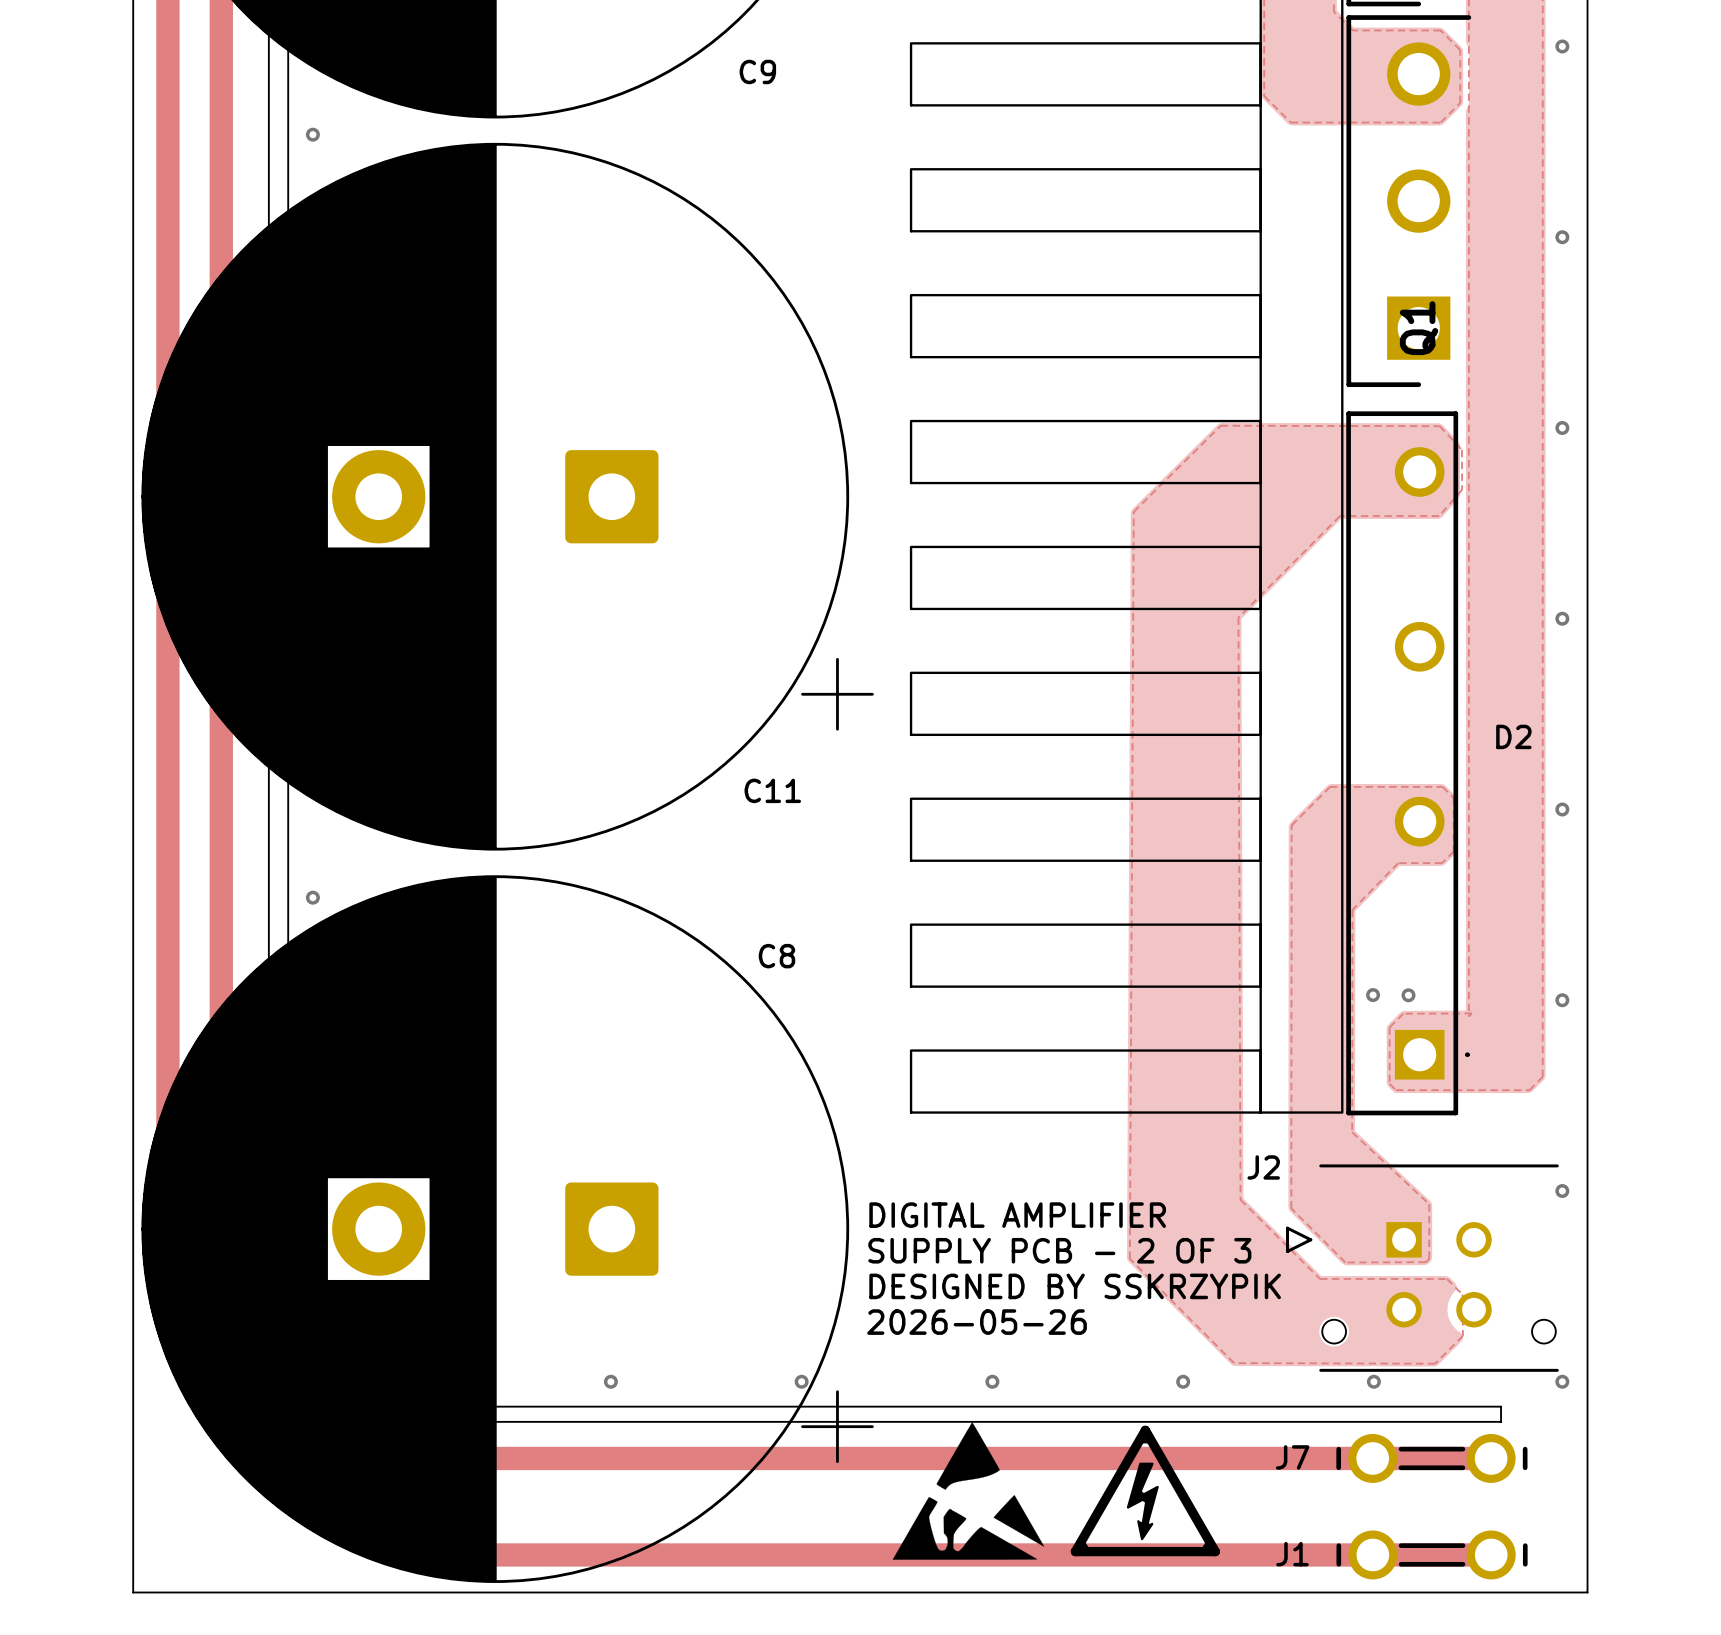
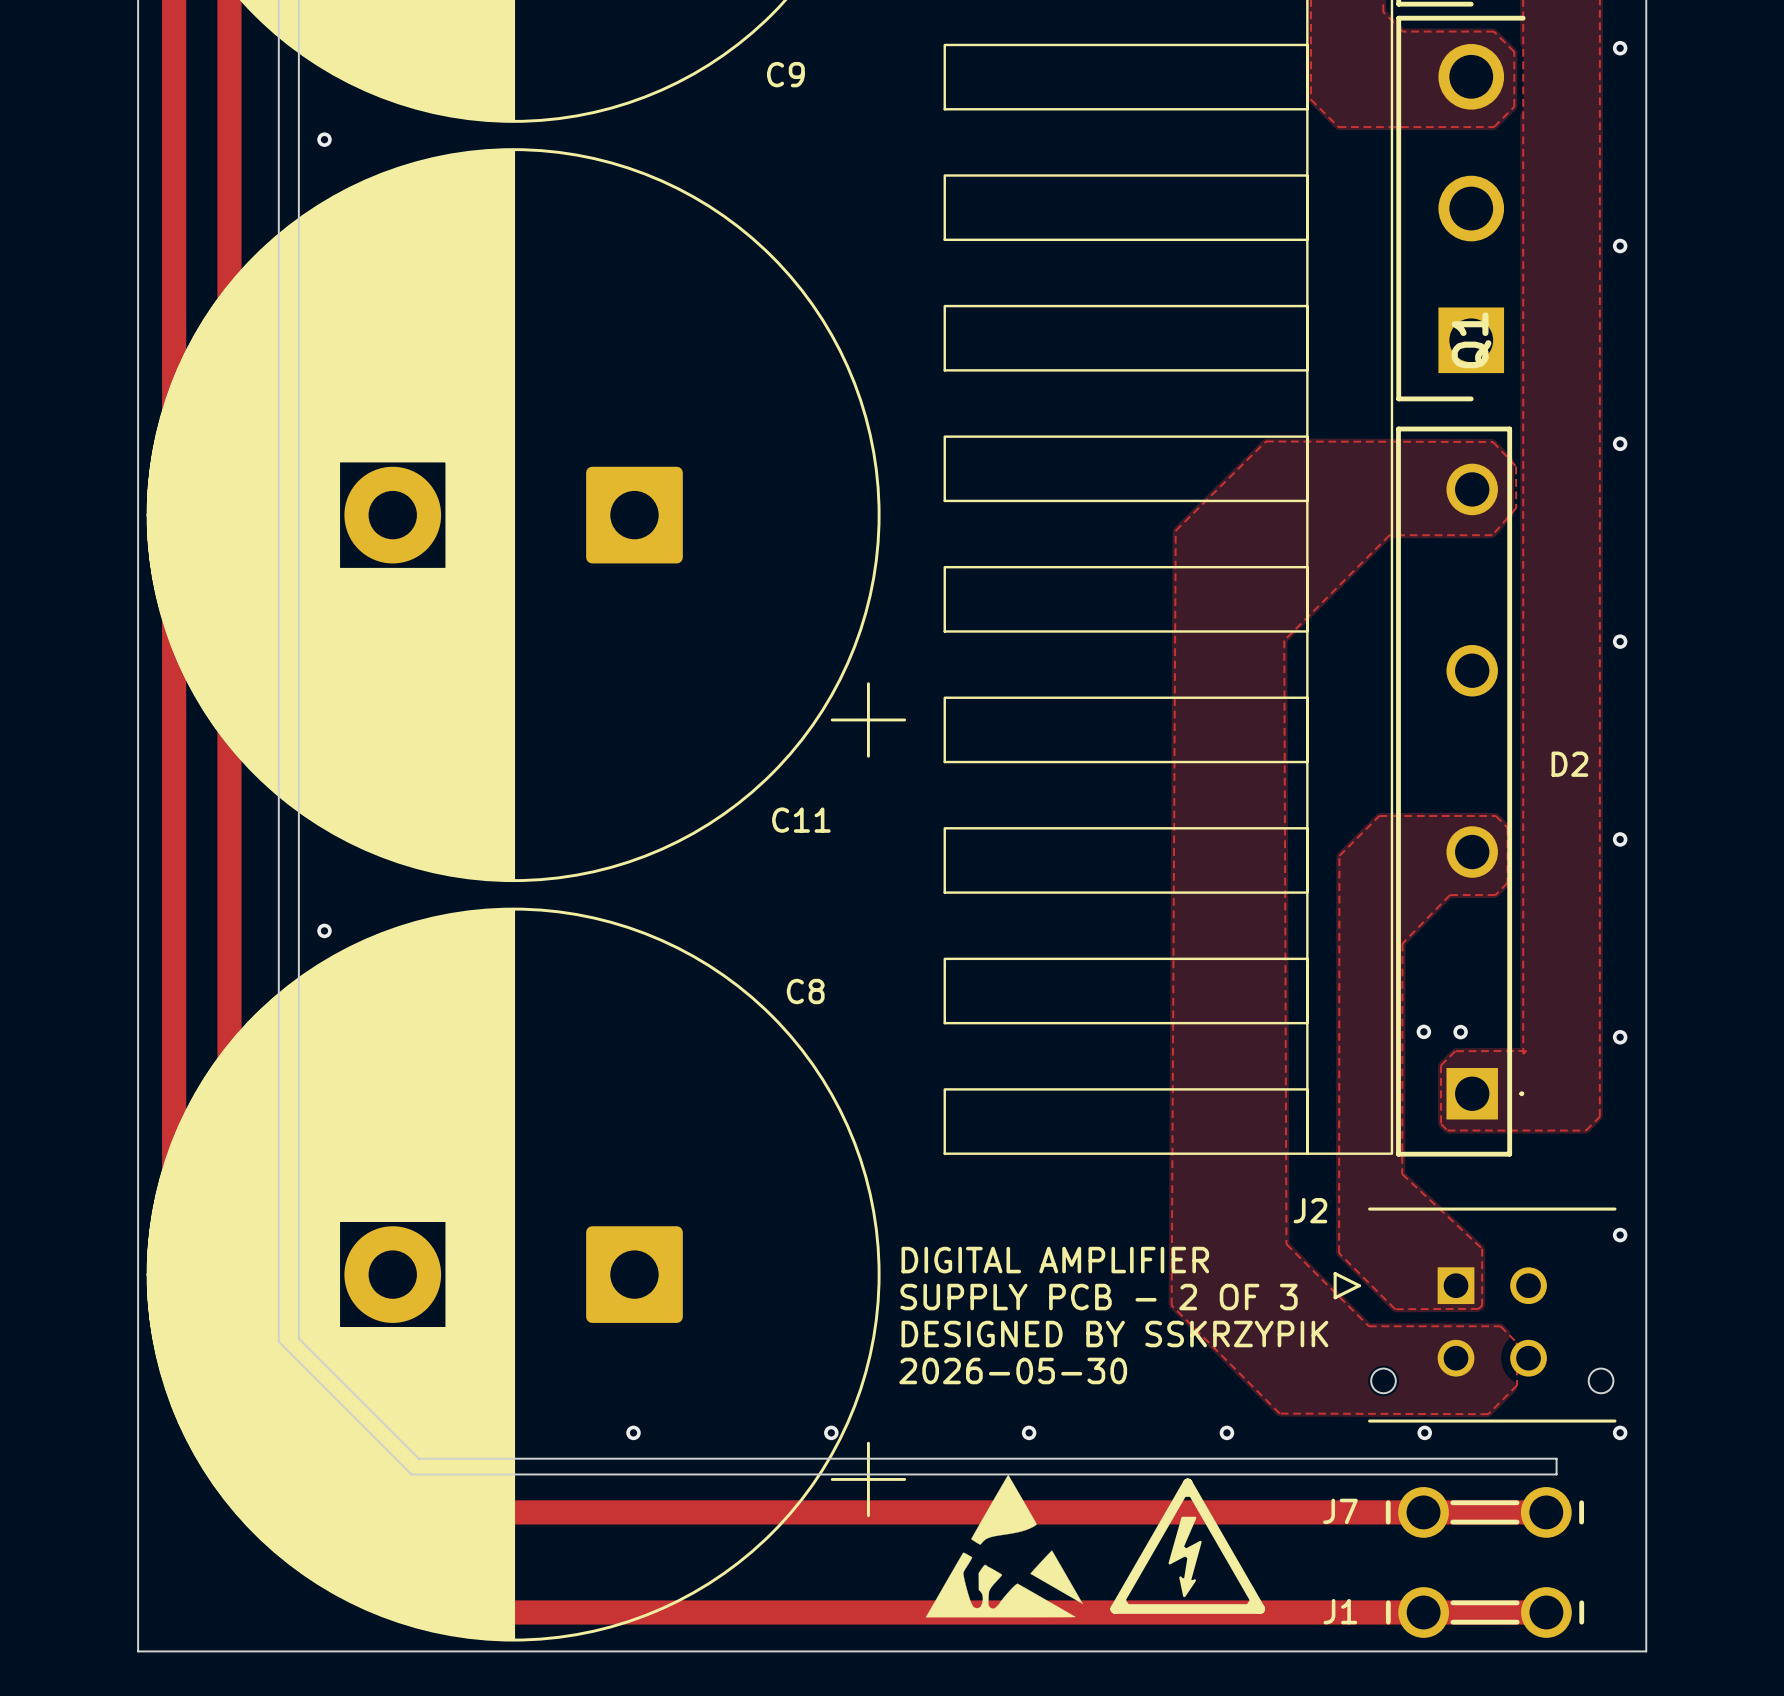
text: 2026-05-26 (977, 1322) -> 2026-05-30 (1013, 1370)

